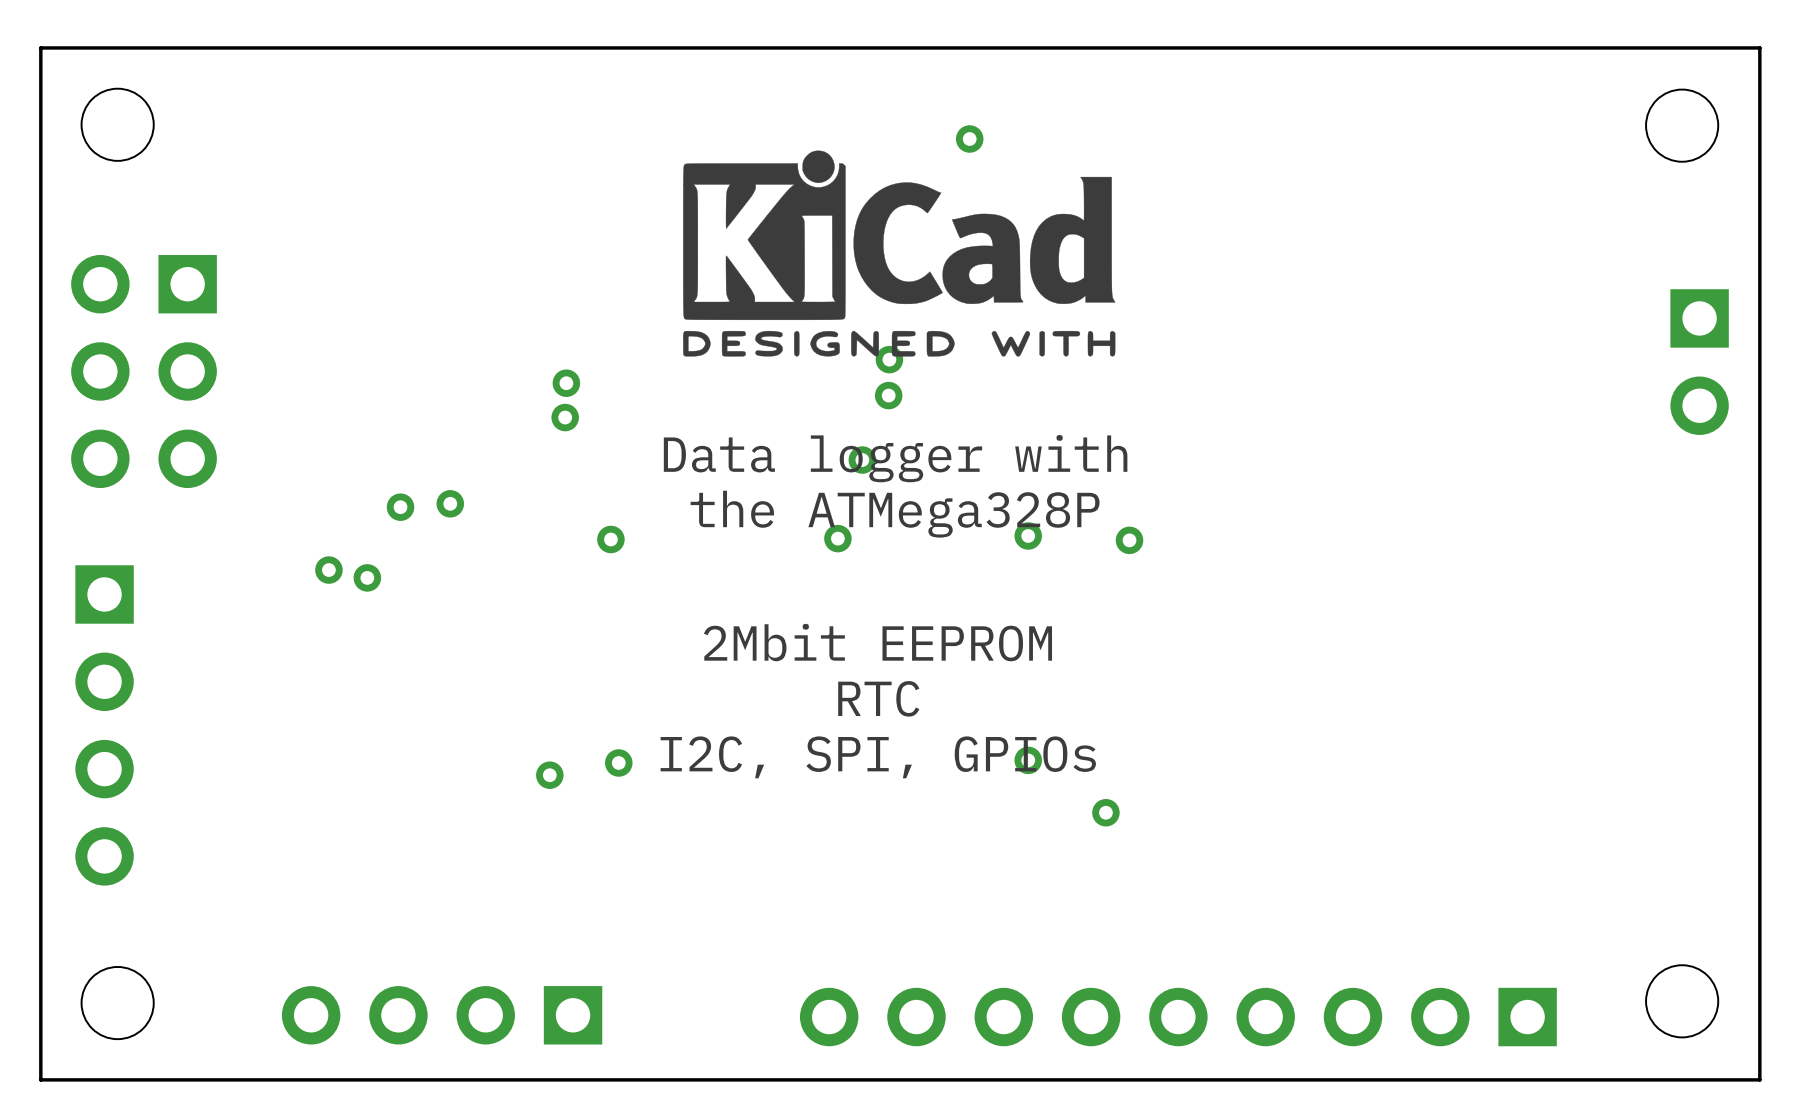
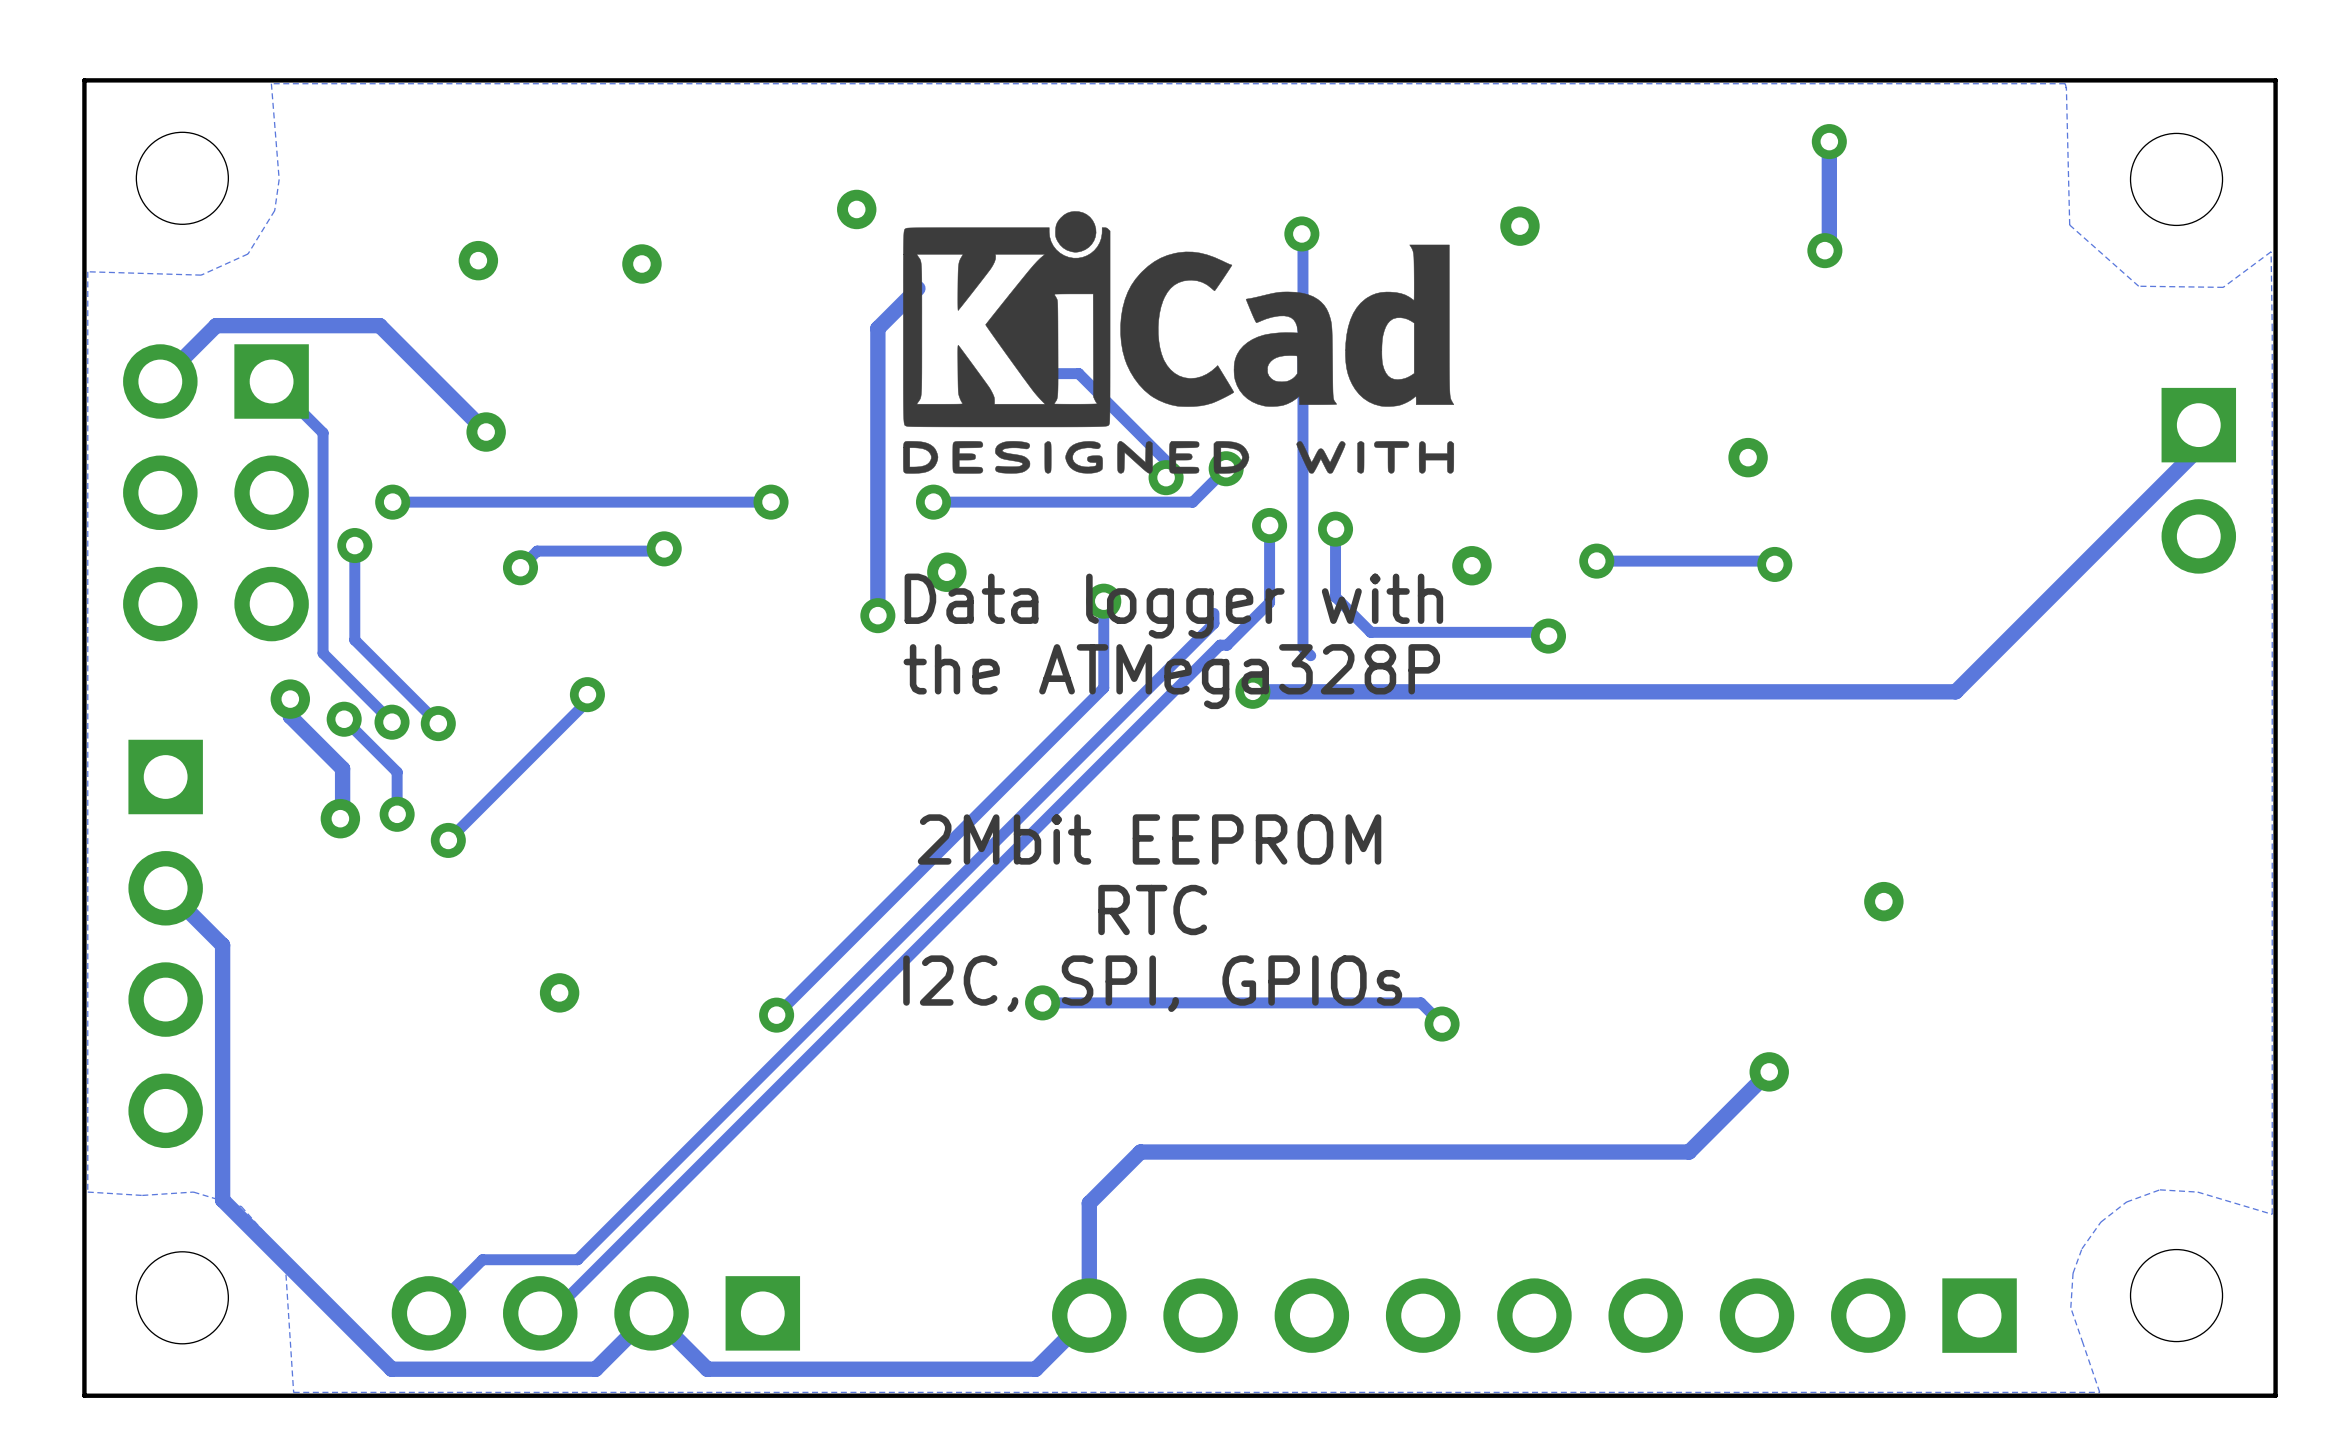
zone outline: none -> (2065, 83) (2069, 225) (2138, 286) (2223, 287) (2271, 251) (2272, 1214) (2197, 1192) (2159, 1189) (2126, 1202) (2100, 1222) (2081, 1248) (2073, 1273) (2070, 1307) (2099, 1392) (293, 1392) (284, 1255) (241, 1206) (193, 1192) (142, 1195) (87, 1192) (87, 271) (201, 275) (248, 253) (274, 210) (279, 179) (271, 83) (2065, 83)
track: none -> (1829, 141) (1829, 246) (1824, 250)
via: none -> (1829, 141)
via position: (969, 139) -> (1301, 233)
via: none -> (856, 209)
via: none -> (1519, 226)
track: none -> (1301, 233) (1302, 647) (1310, 655)
via: none -> (1824, 250)
via: none -> (478, 260)
via: none -> (641, 263)
track: none -> (917, 288) (877, 328) (877, 615)
track: none -> (1026, 373) (1078, 373) (1169, 464)
track: none -> (160, 381) (216, 325) (379, 325) (486, 432)
track: none -> (271, 381) (323, 432) (323, 653) (392, 722)
track: none -> (2198, 425) (2198, 448) (1955, 691) (1253, 691)
via: none -> (486, 432)
via: none -> (1748, 457)
track: none -> (1226, 468) (1192, 502) (933, 502)
via: none -> (1226, 468)
via: none -> (392, 502)
track: none -> (771, 502) (392, 502)
via: none -> (933, 502)
via position: (566, 383) -> (771, 502)
via: (888, 395) -> none
track: none -> (1269, 525) (1269, 602) (1227, 645) (1220, 645) (551, 1313) (540, 1313)
via: none -> (1269, 525)
track: none -> (1335, 529) (1335, 597) (1370, 632) (1544, 632) (1548, 636)
via: none -> (1335, 529)
track: none -> (354, 545) (354, 640) (438, 723)
via: none -> (354, 545)
track: none -> (664, 548) (661, 551) (537, 551) (520, 567)
via: none -> (664, 548)
via: (565, 417) -> none
track: none -> (1596, 561) (1771, 561) (1774, 564)
via: none -> (1596, 561)
via: none -> (1774, 564)
via: none -> (1471, 565)
via: none -> (520, 567)
via: none -> (946, 572)
track: none -> (1103, 601) (1103, 687) (776, 1015)
via position: (862, 460) -> (1103, 601)
track: none -> (1213, 613) (1213, 623) (577, 1259) (482, 1259) (428, 1313)
via: none -> (877, 615)
via: none -> (1548, 636)
via position: (450, 503) -> (587, 694)
via: (400, 507) -> none
via: none -> (1252, 691)
track: none -> (587, 694) (587, 701) (448, 840)
track: none -> (290, 699) (290, 716) (342, 768) (342, 816) (340, 818)
via: none -> (290, 699)
via: (1028, 535) -> none
via: (837, 538) -> none
via: (610, 539) -> none
via: (1129, 540) -> none
track: none -> (344, 719) (397, 772) (397, 814)
via: none -> (344, 719)
via: none -> (392, 722)
via position: (328, 570) -> (438, 723)
via: (367, 577) -> none
via: none -> (397, 814)
via: none -> (340, 818)
via: none -> (448, 840)
track: none -> (165, 888) (222, 945) (222, 1200) (391, 1369) (595, 1369) (651, 1313) (707, 1369) (1035, 1369) (1089, 1315) (1089, 1203) (1140, 1152) (1689, 1152) (1769, 1071)
via: none -> (1883, 901)
via: (1028, 760) -> none
via: (618, 762) -> none
via: none -> (559, 992)
track: none -> (1042, 1002) (1420, 1002) (1442, 1024)
via: none -> (1042, 1002)
via: (549, 775) -> none
via: none -> (776, 1015)
via position: (1105, 812) -> (1442, 1024)
via: none -> (1769, 1071)

